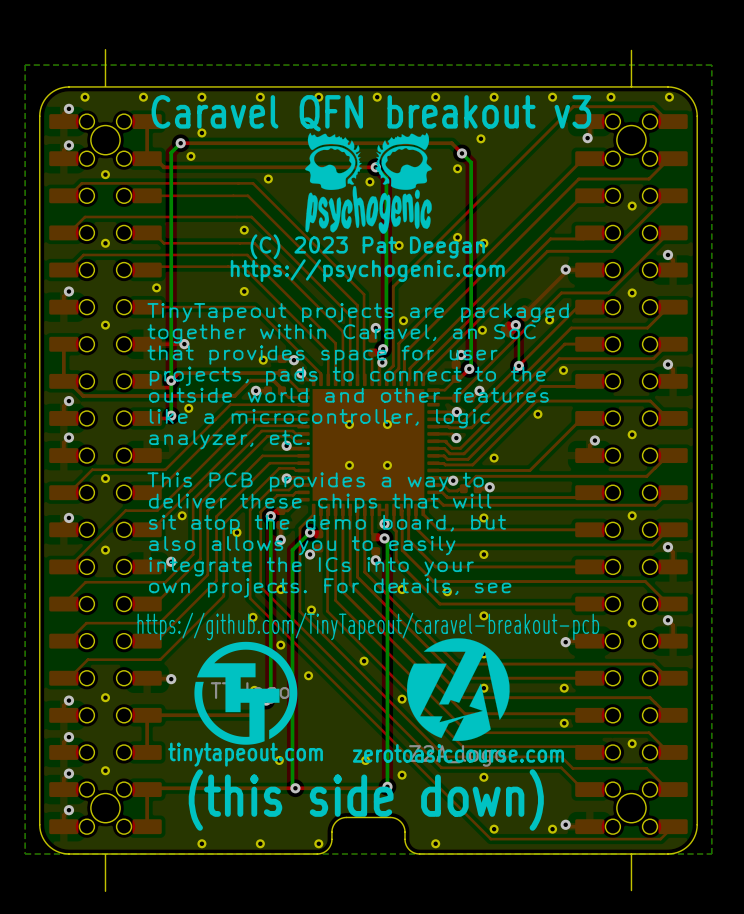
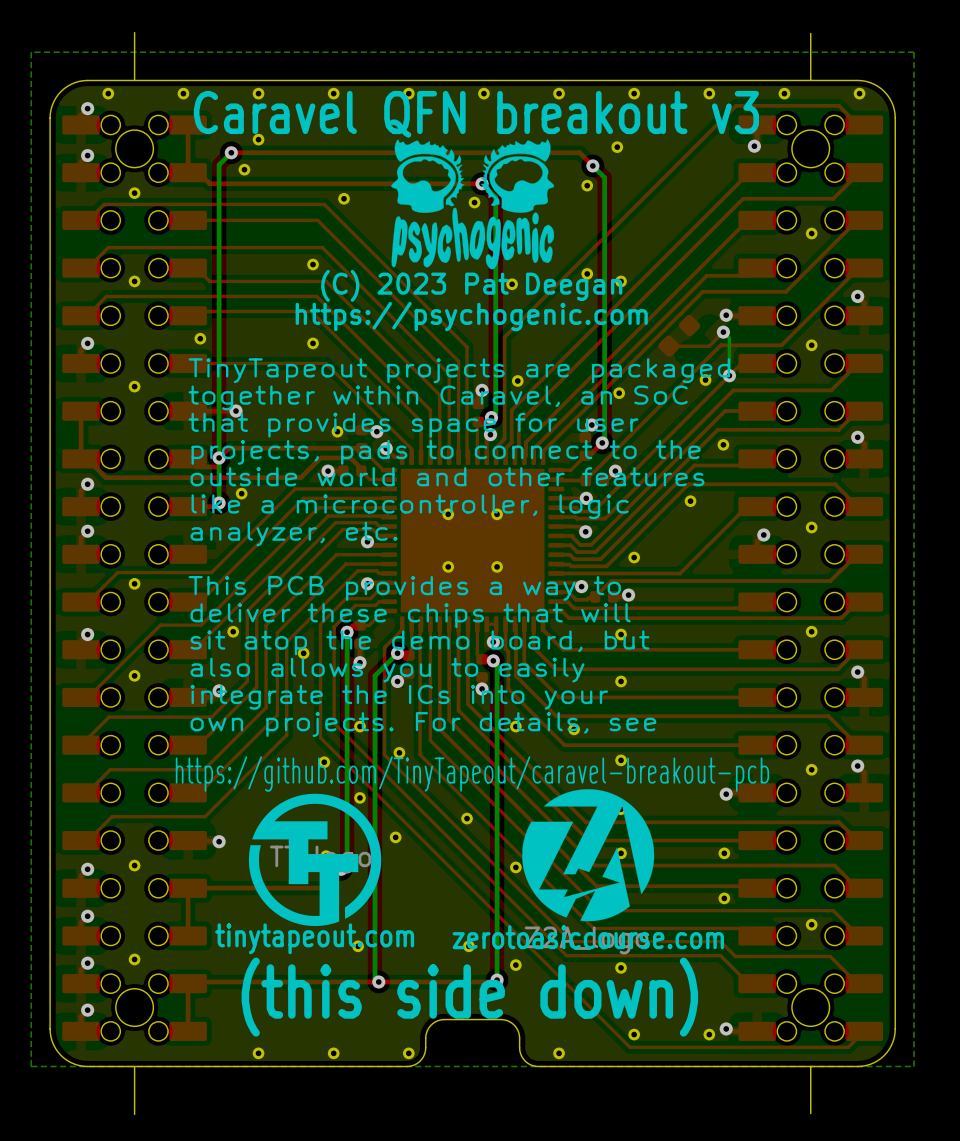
top track: (565, 269) (565, 272) (524, 313) -> none
top track: none -> (723, 332) (709, 346) (668, 346)
bottom track: none -> (723, 332) (729, 338) (729, 375)
via: none -> (723, 332)
via: none -> (729, 375)
part position: (516, 321) -> (679, 335)
bottom track: (515, 325) (518, 328) (518, 365) -> none
via: (515, 325) -> none
via: (518, 365) -> none

